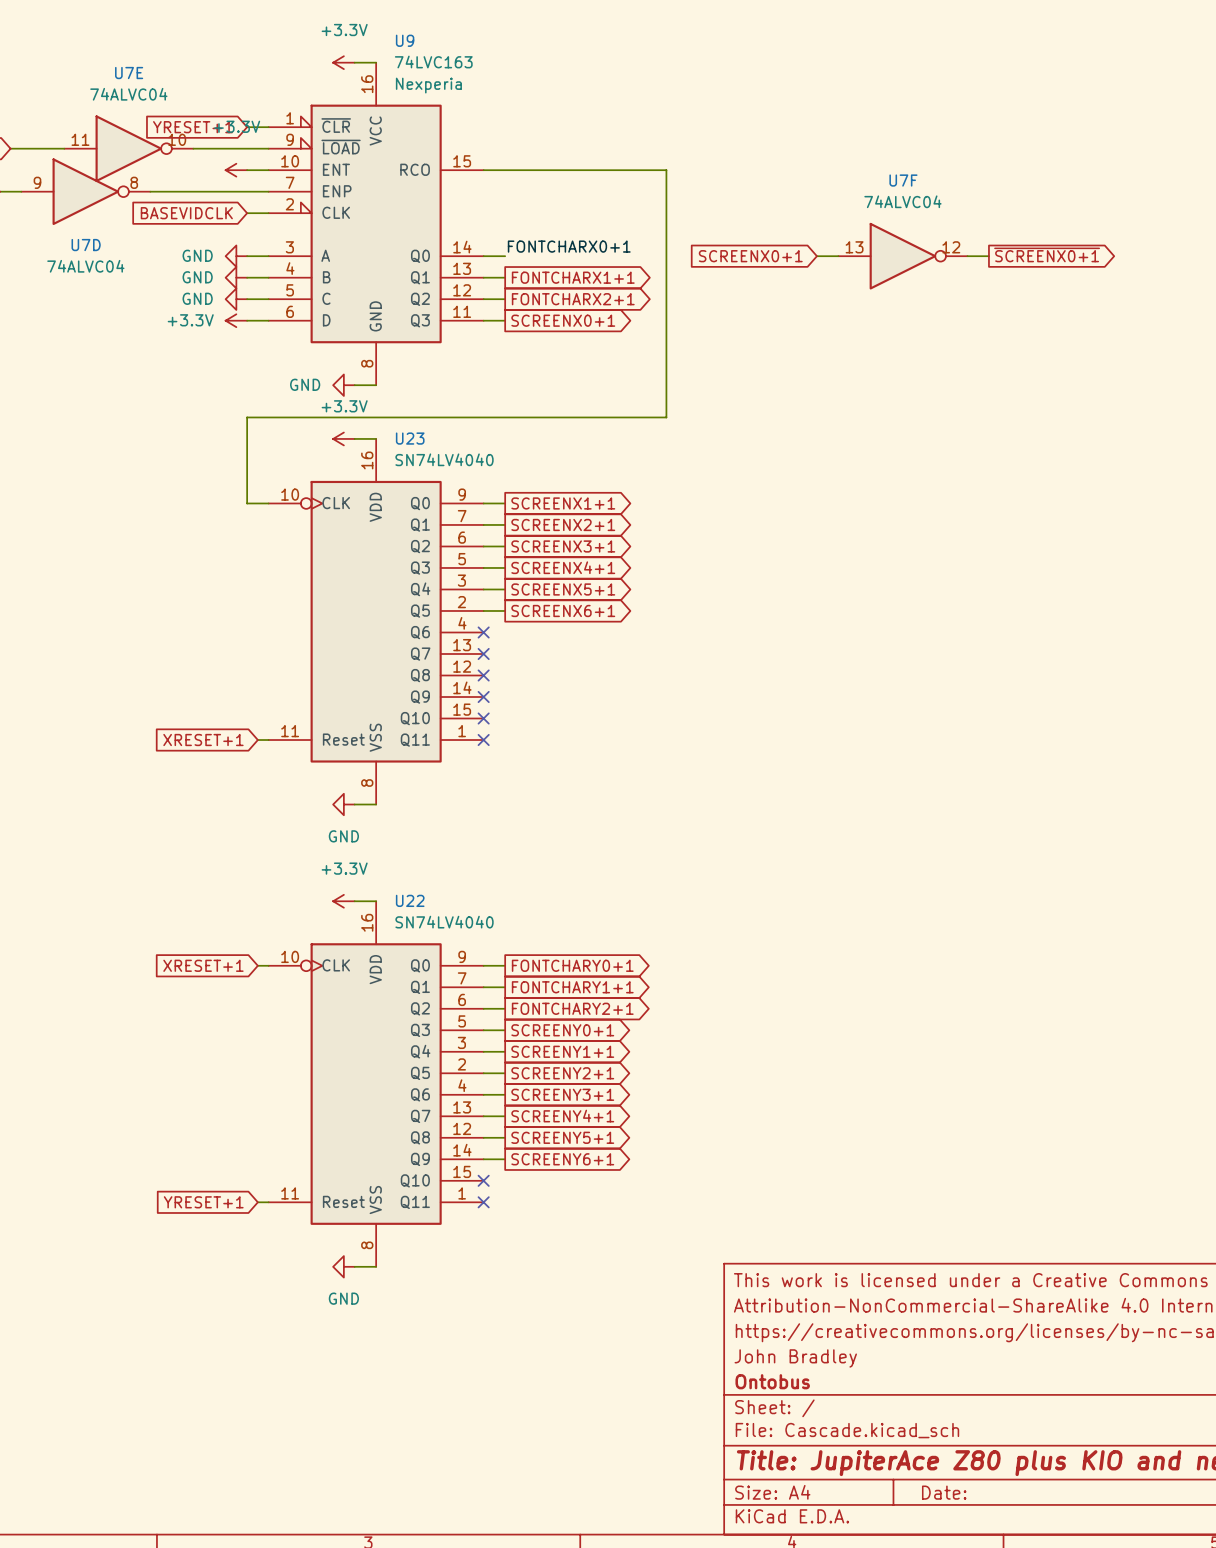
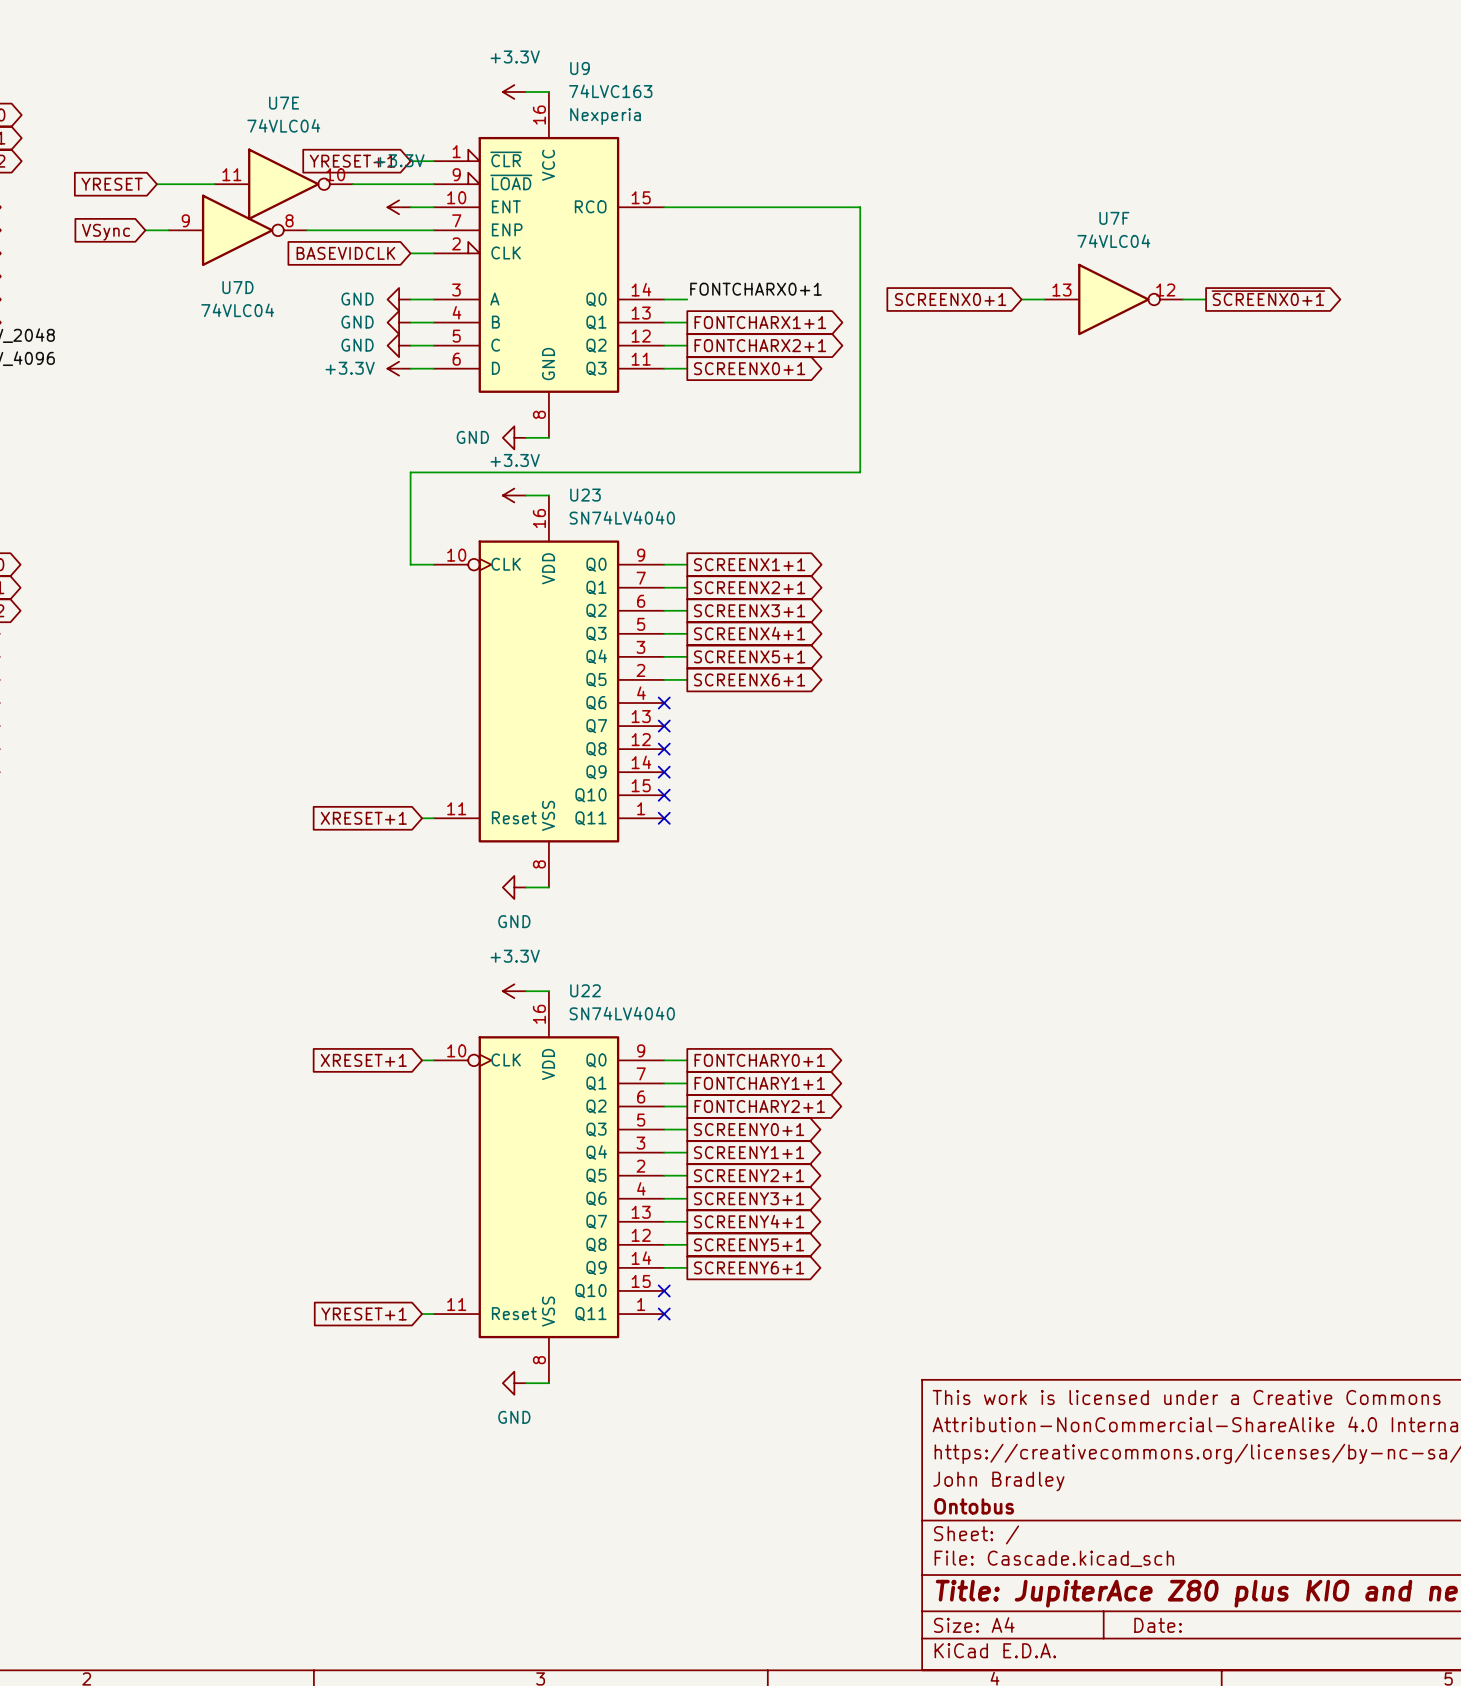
U7E value: 74ALVC04 (128, 94) -> 74VLC04 (283, 125)
U7F value: 74ALVC04 (902, 201) -> 74VLC04 (1113, 241)
U7D value: 74ALVC04 (85, 266) -> 74VLC04 (237, 310)

